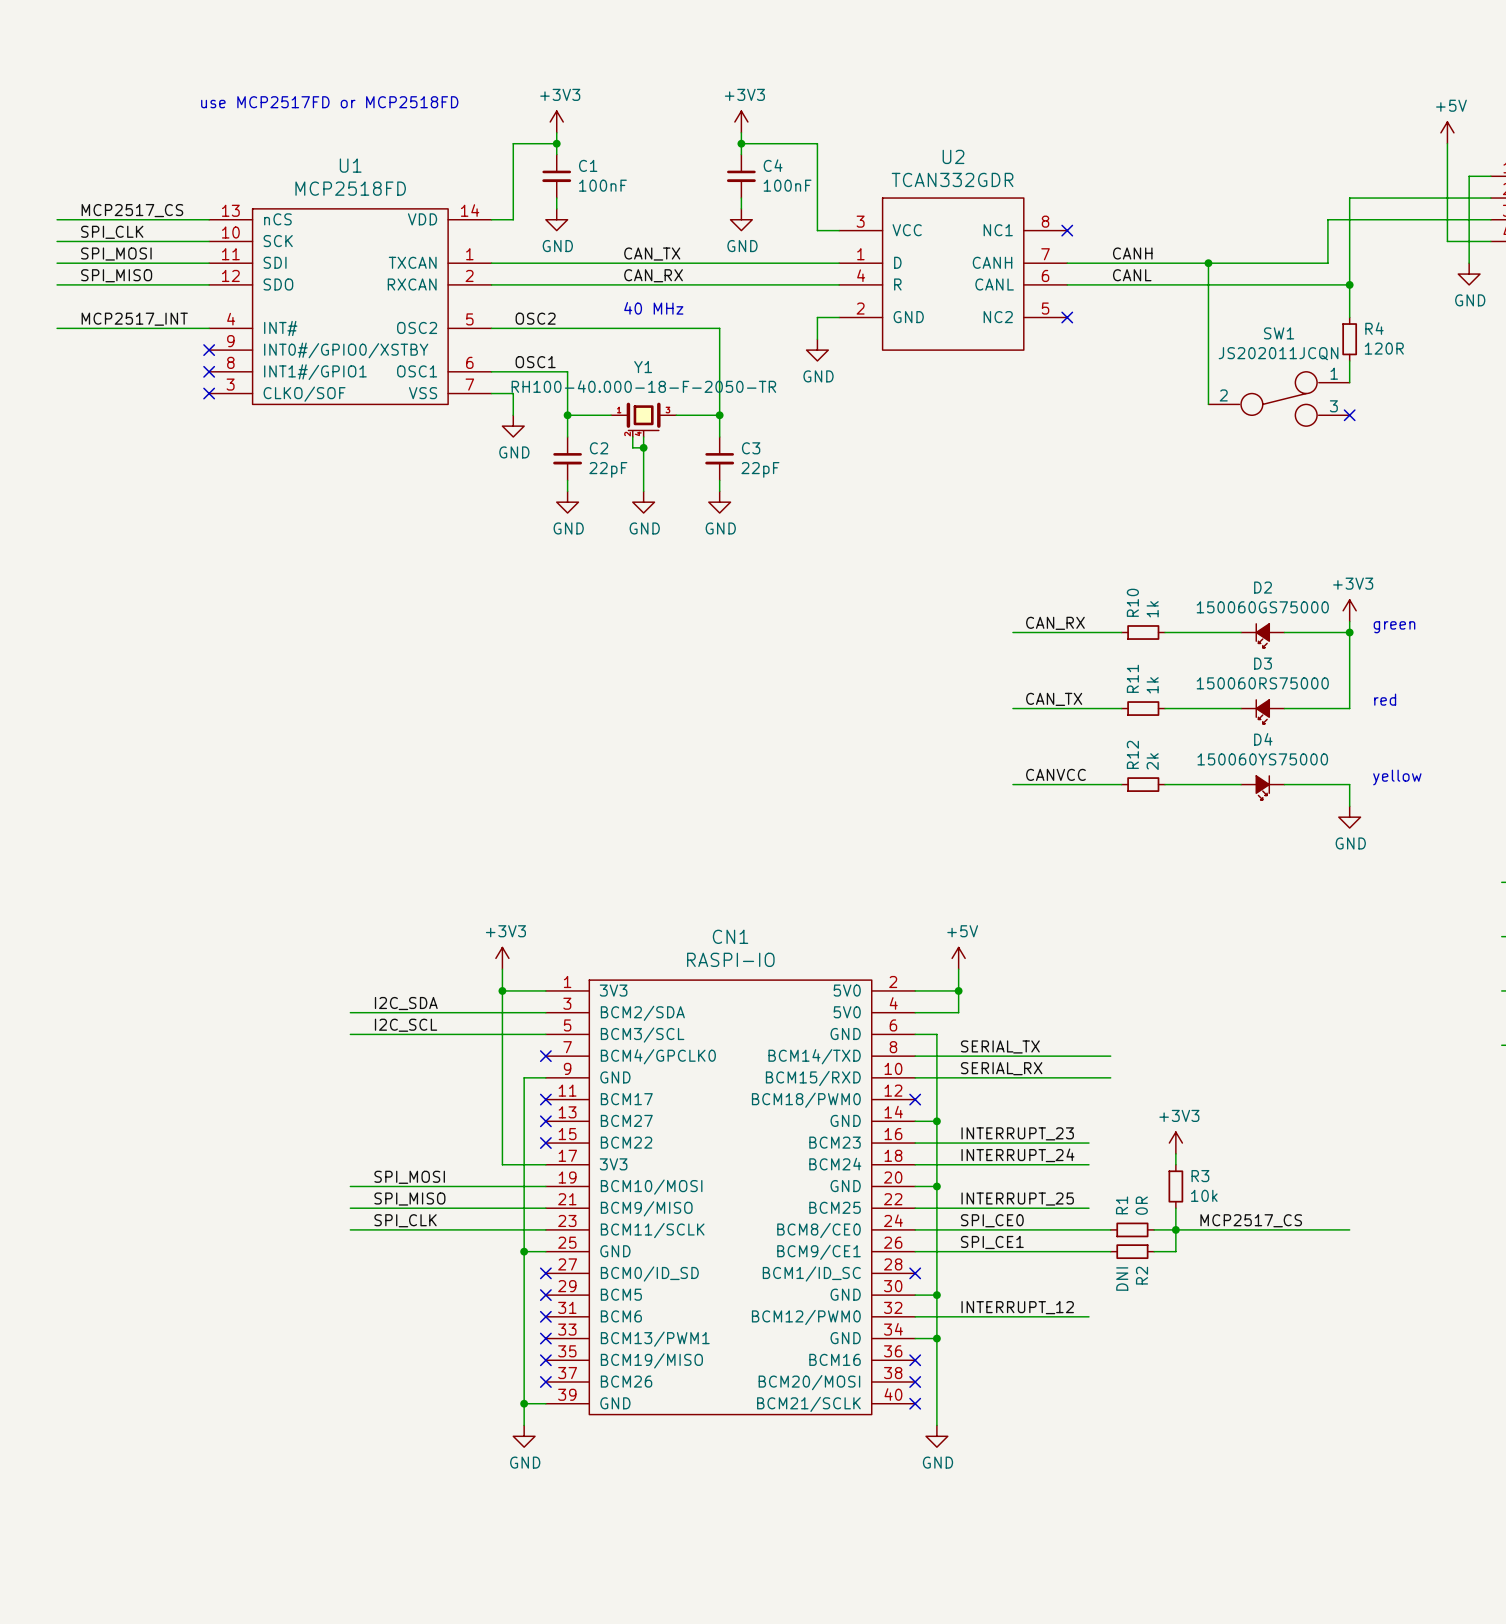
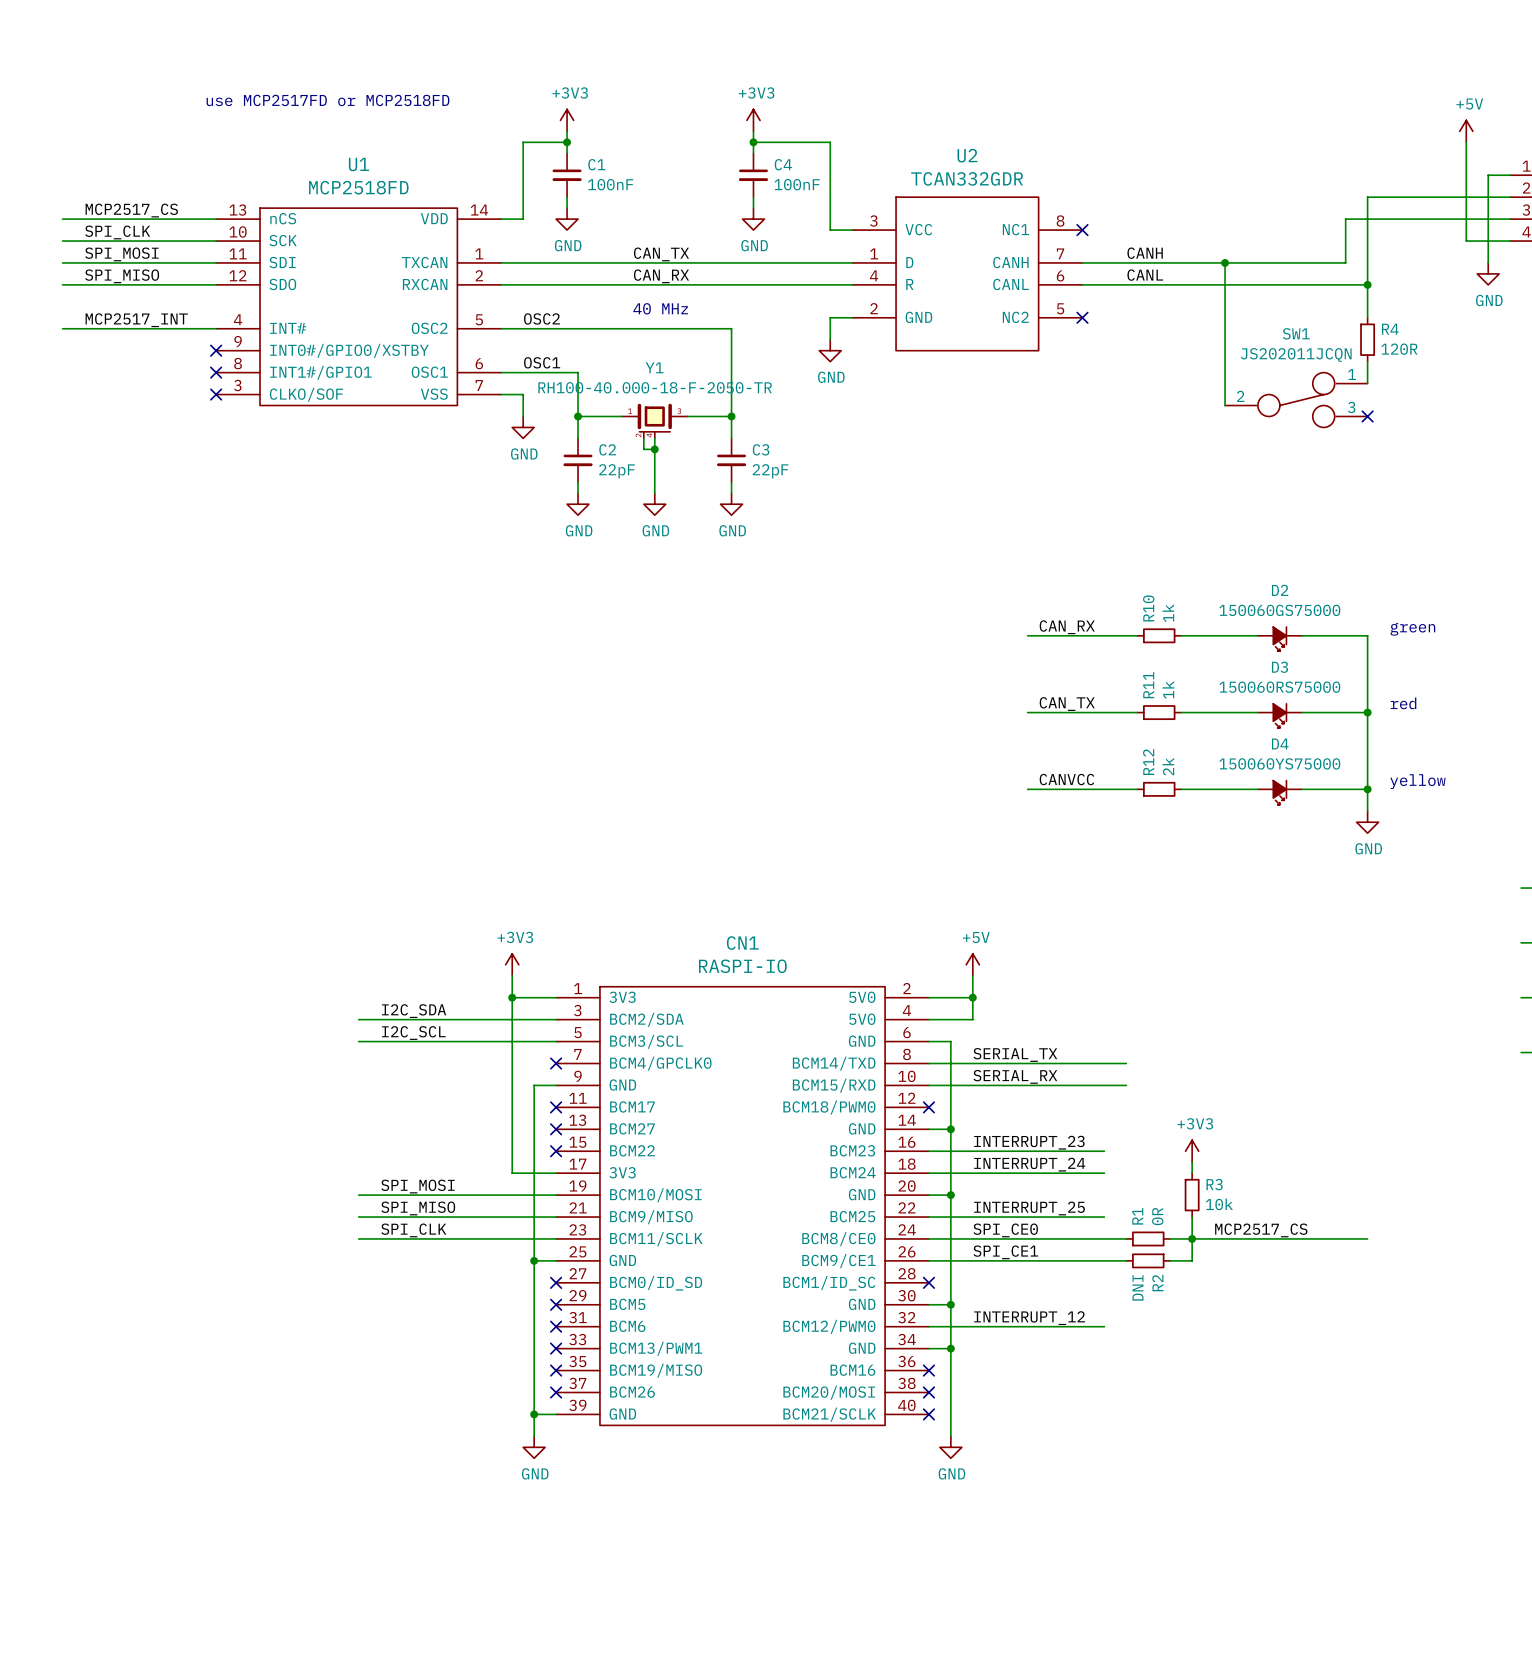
power symbol: +3V3 (1349, 610) -> none
wire: (1349, 621) (1349, 632) -> none
junction: (1349, 632) -> none
D2 flip: as is (1262, 635) -> left-right (1279, 639)
wire: none -> (1367, 712) (1367, 789)
junction: none -> (1367, 712)
D3 flip: as is (1262, 711) -> left-right (1279, 715)
junction: none -> (1367, 789)

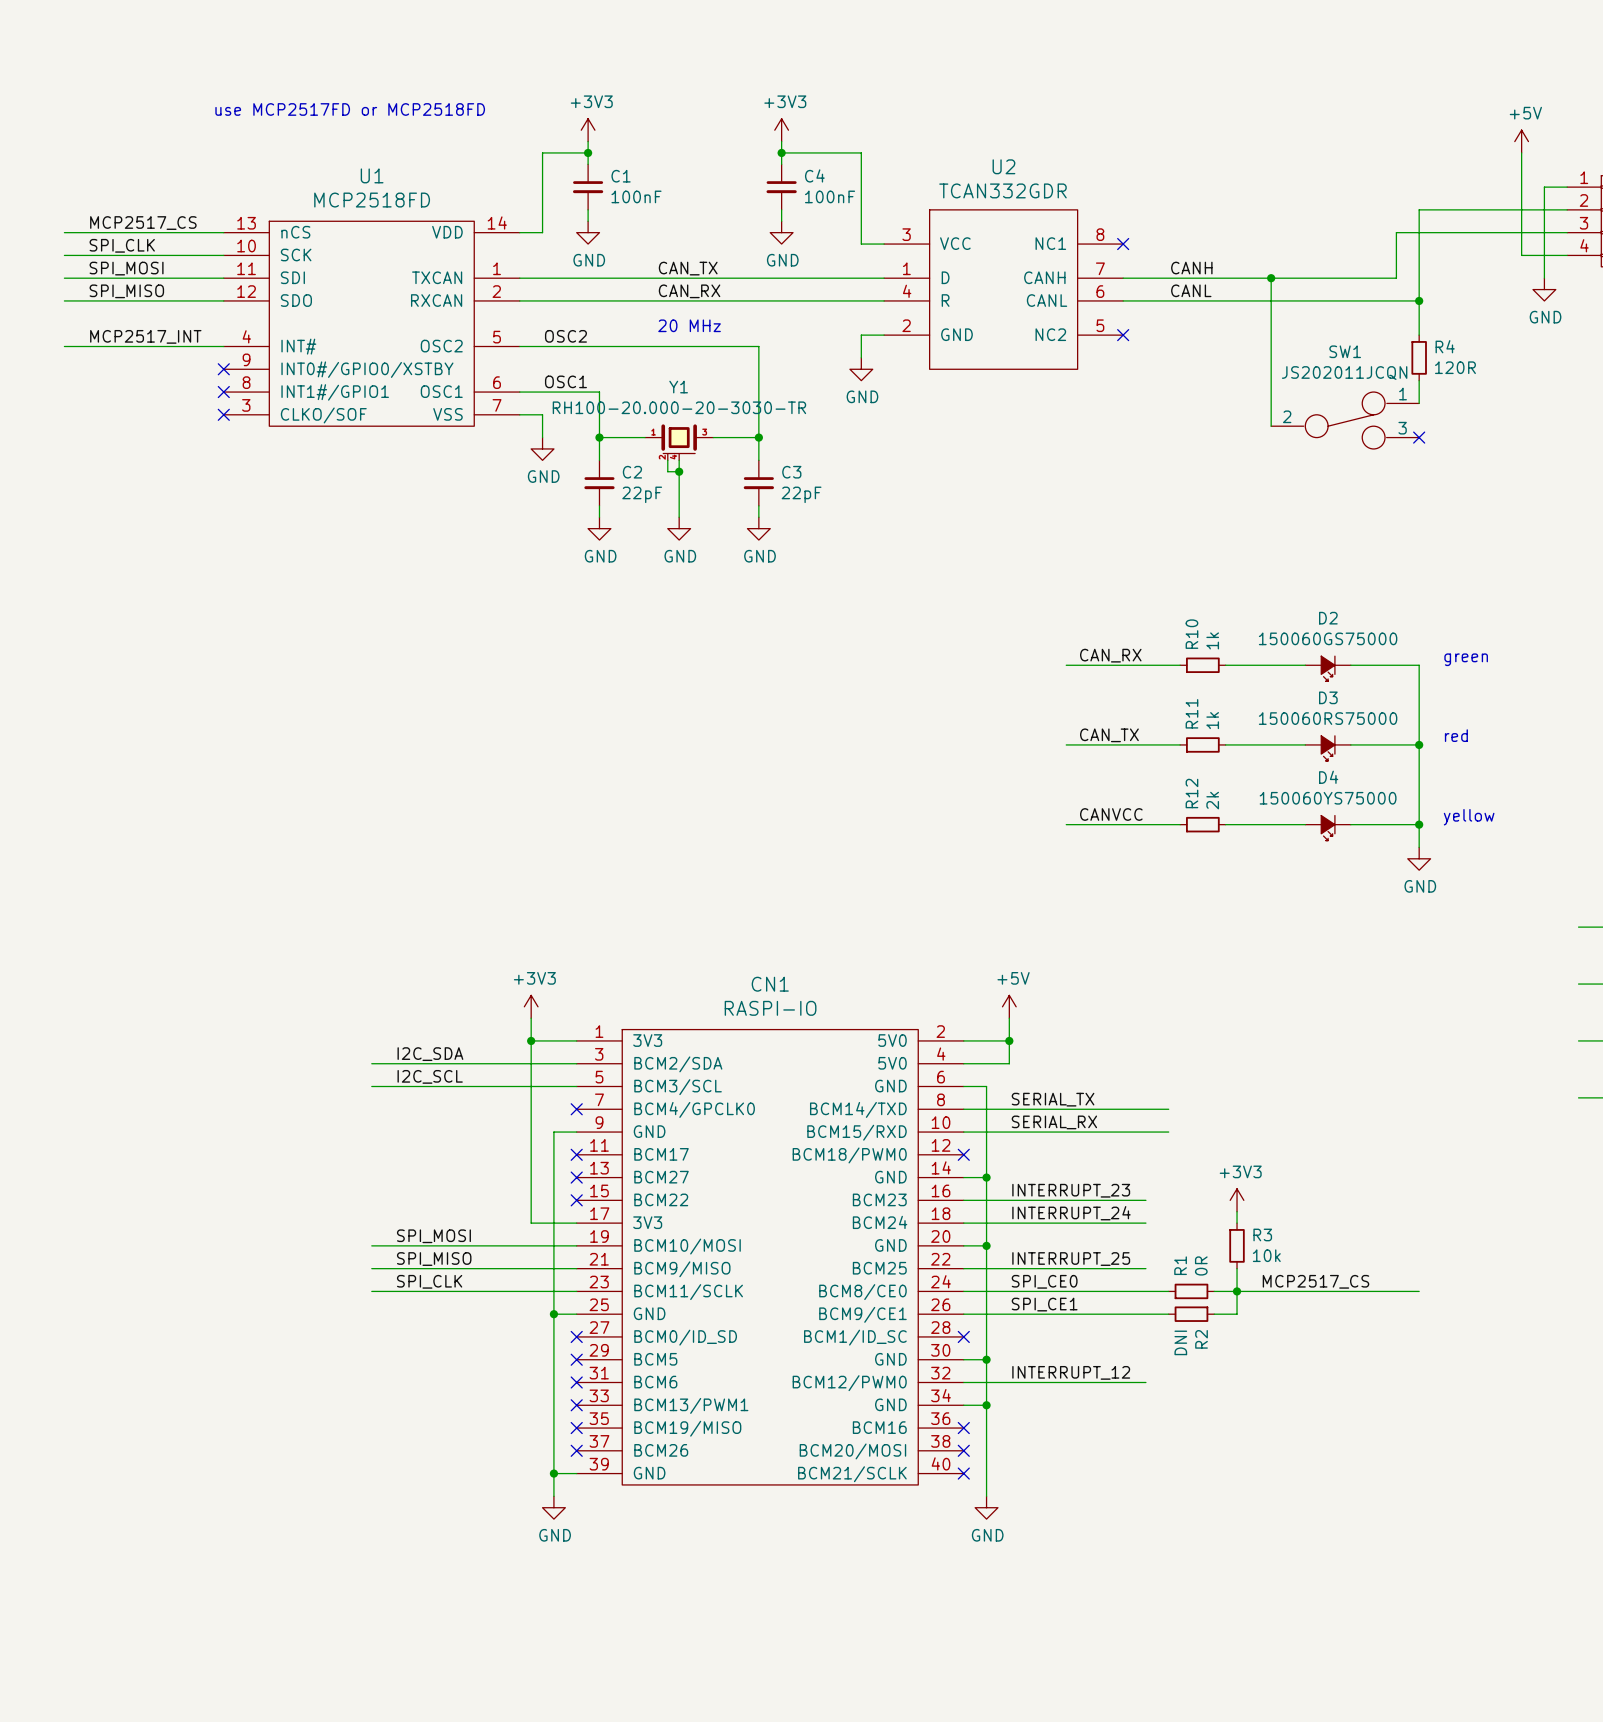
text: 40 MHz (660, 308) -> 20 MHz (689, 325)
Y1 value: RH100-40.000-18-F-2050-TR (655, 387) -> RH100-20.000-20-3030-TR (679, 407)

